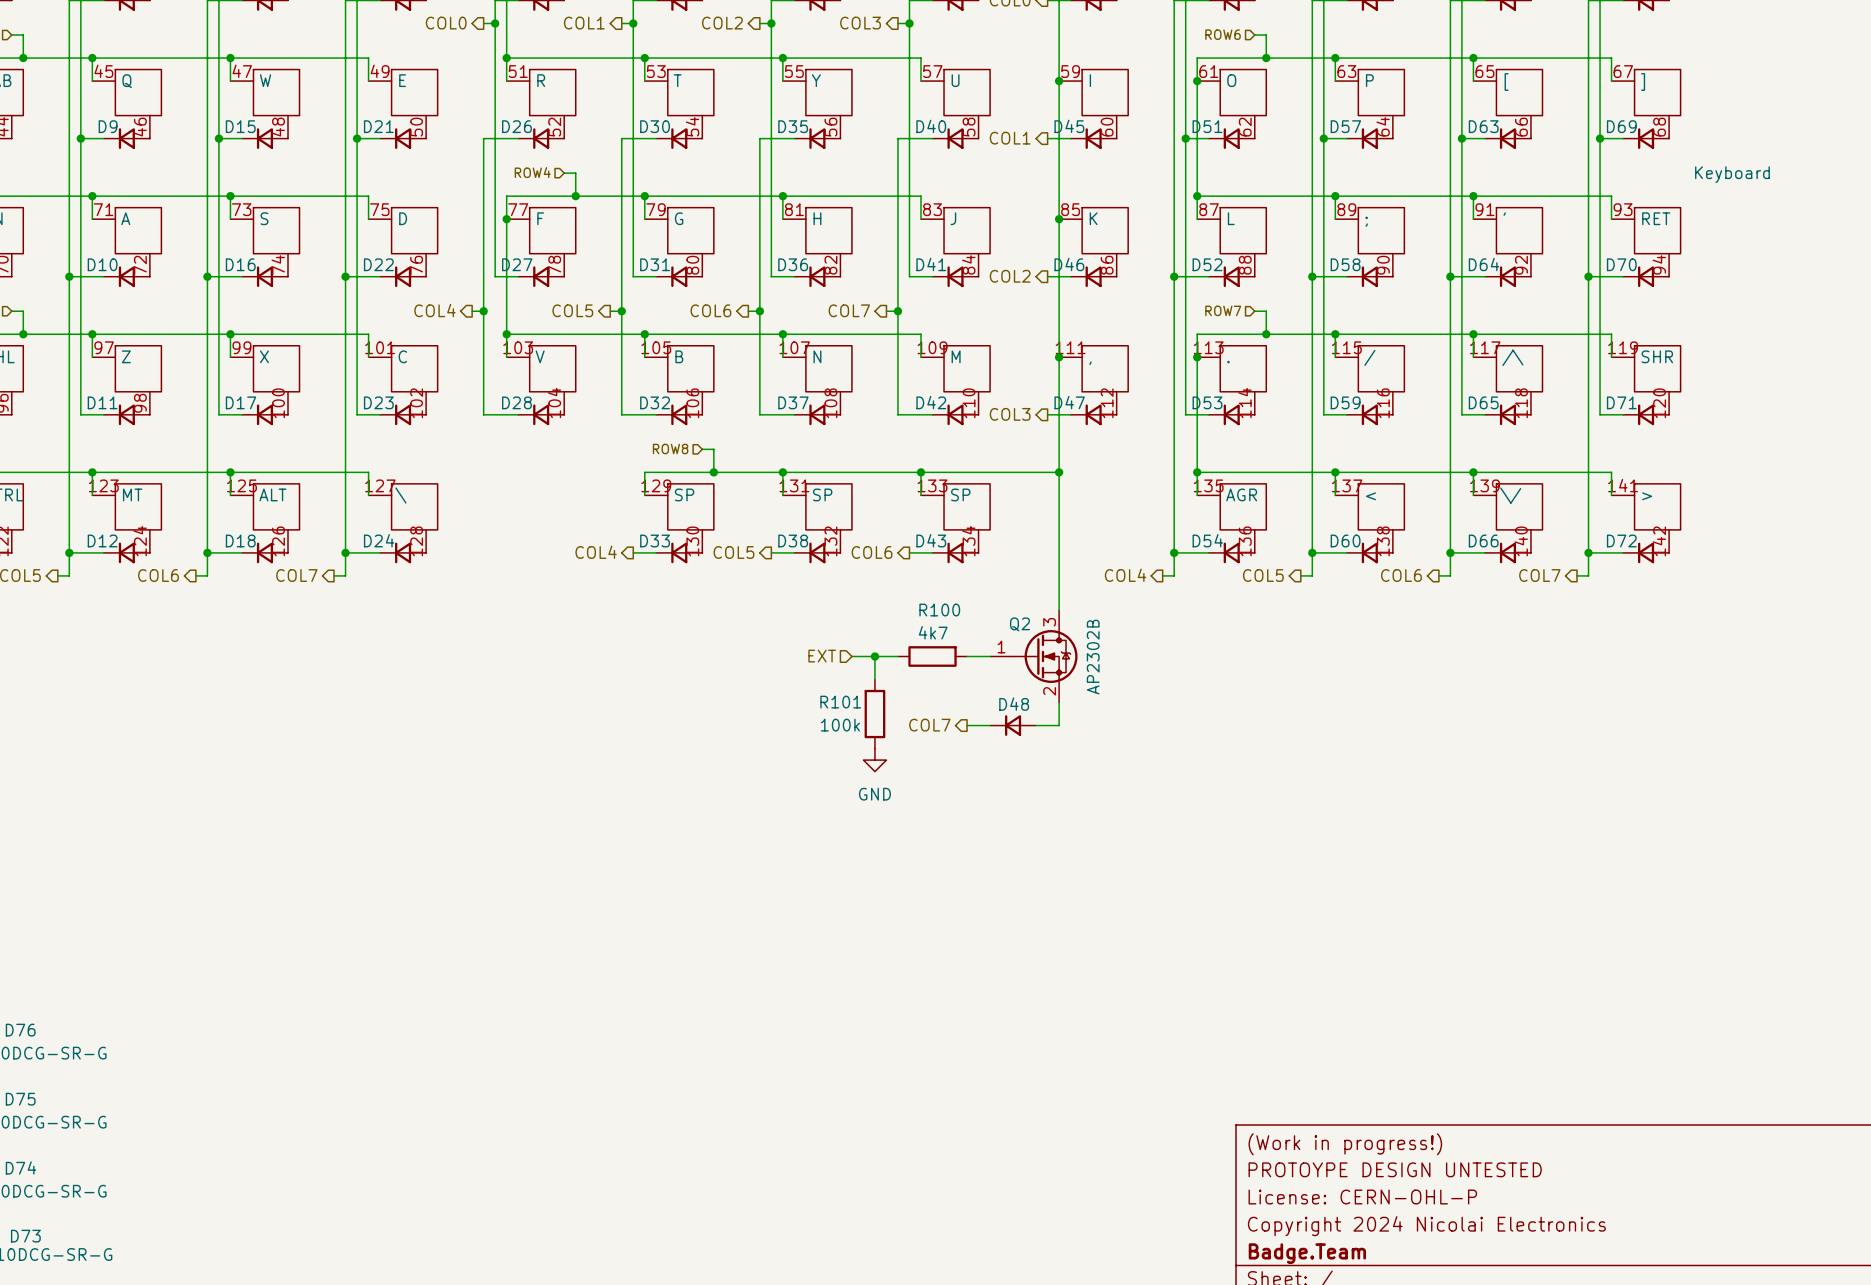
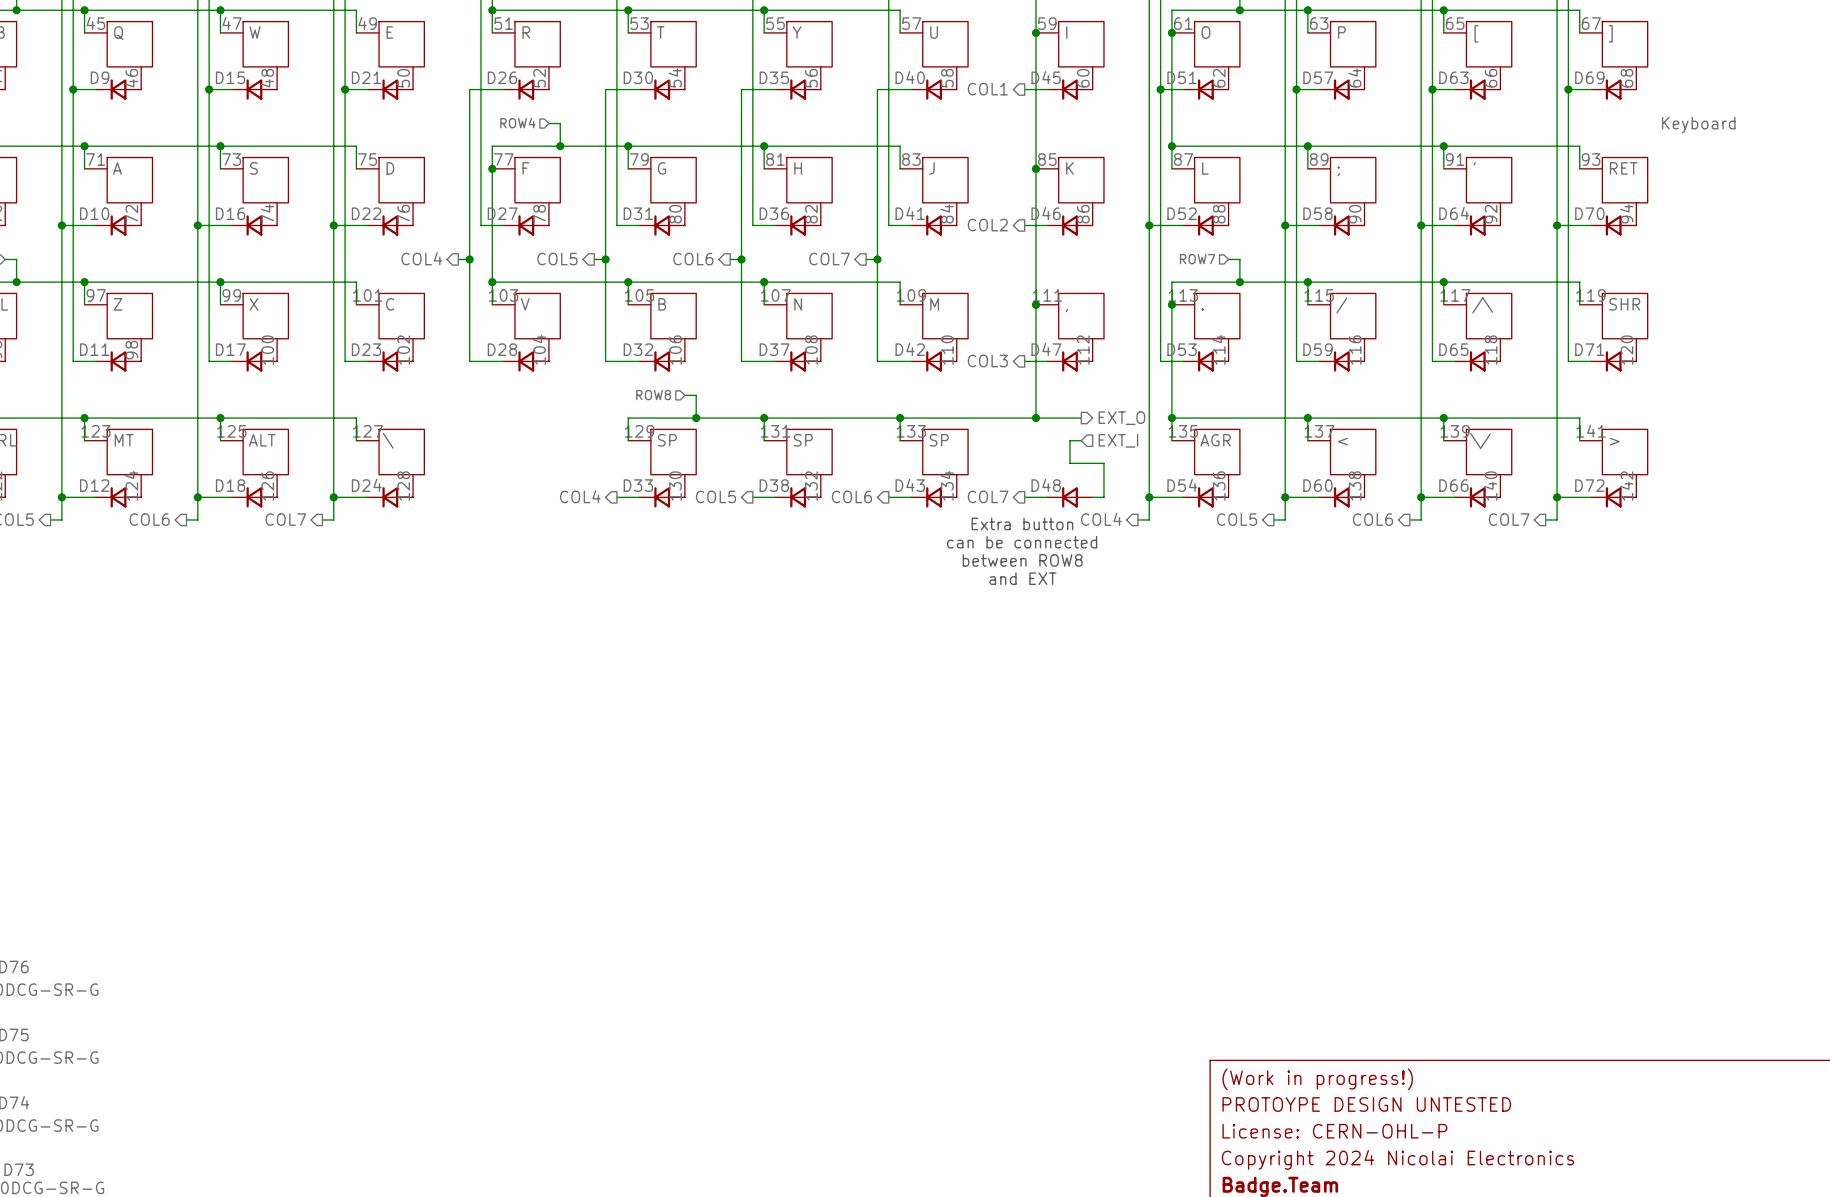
wire: (1059, 472) (1059, 610) -> (1036, 418) (1081, 418)
hierarchical label: none -> EXT_O (1121, 418)
wire: none -> (1081, 440) (1069, 440) (1069, 463) (1103, 463) (1103, 497) (1092, 497)
hierarchical label: none -> EXT_I (1118, 440)
text: none -> Extra button (1022, 523)
text: none -> can be connected (1022, 542)
text: none -> between ROW8 (1022, 560)
text: none -> and EXT (1022, 578)
hierarchical label: EXT (822, 656) -> none
wire: (851, 656) (897, 656) -> none
wire: (874, 656) (874, 679) -> none
junction: (874, 656) -> none
R100: 4k7 (932, 656) -> none
wire: (967, 656) (990, 656) -> (1024, 497) (1047, 497)
Q2: AP2302B (1033, 656) -> none
wire: (1059, 702) (1059, 725) (1036, 725) -> none
D48 name position: D48 (1014, 704) -> D48 (1046, 485)
R101: 100k (874, 714) -> none
hierarchical label position: COL7 (929, 725) -> COL7 (988, 496)
wire: (967, 725) (990, 725) -> none
D48 position: (1013, 725) -> (1069, 497)
power symbol: GND (874, 760) -> none

